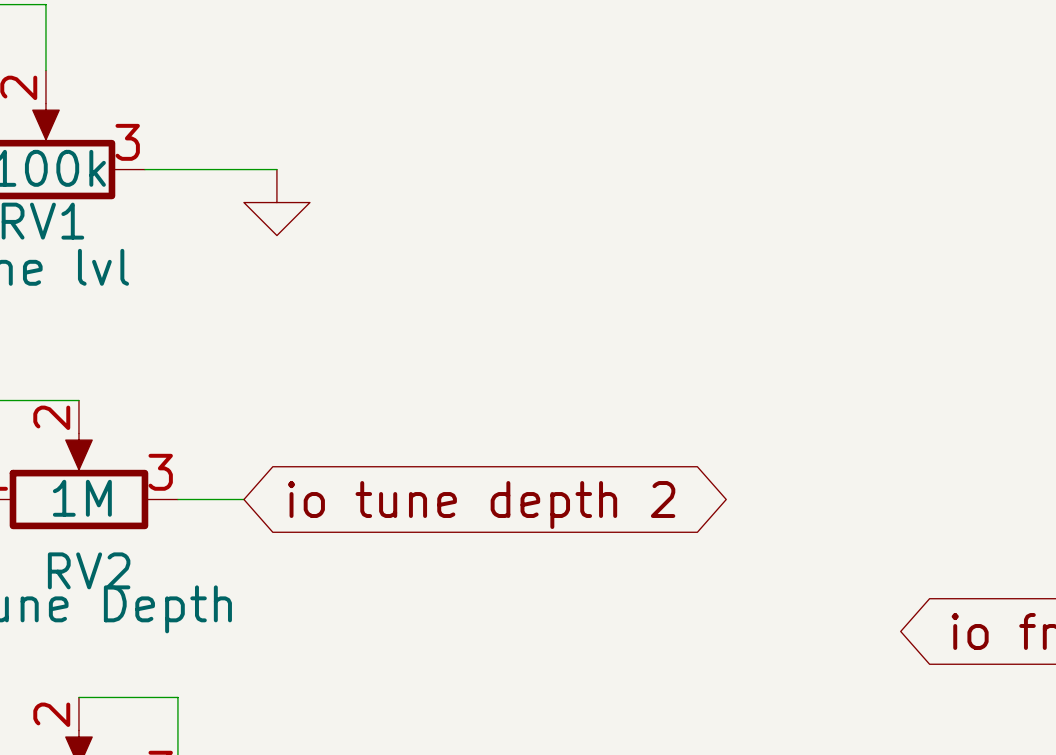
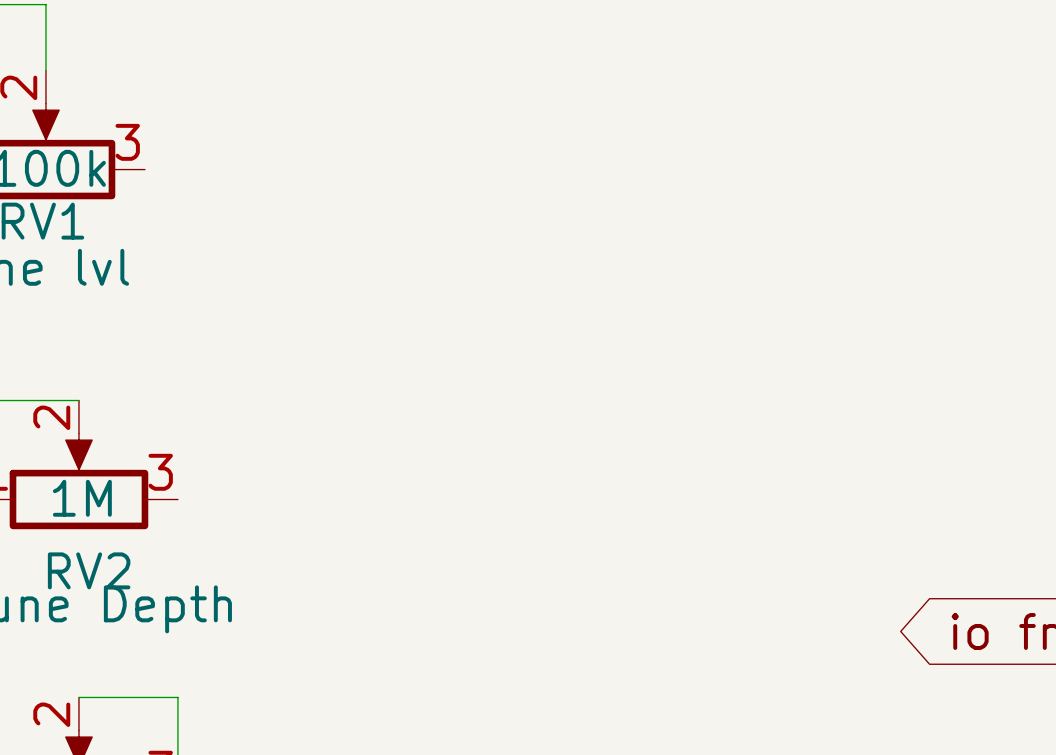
wire: (144, 169) (276, 169) -> none
power symbol: (276, 202) -> none
wire: (177, 499) (243, 499) -> none
global label: io tune depth 2 (481, 505) -> none

